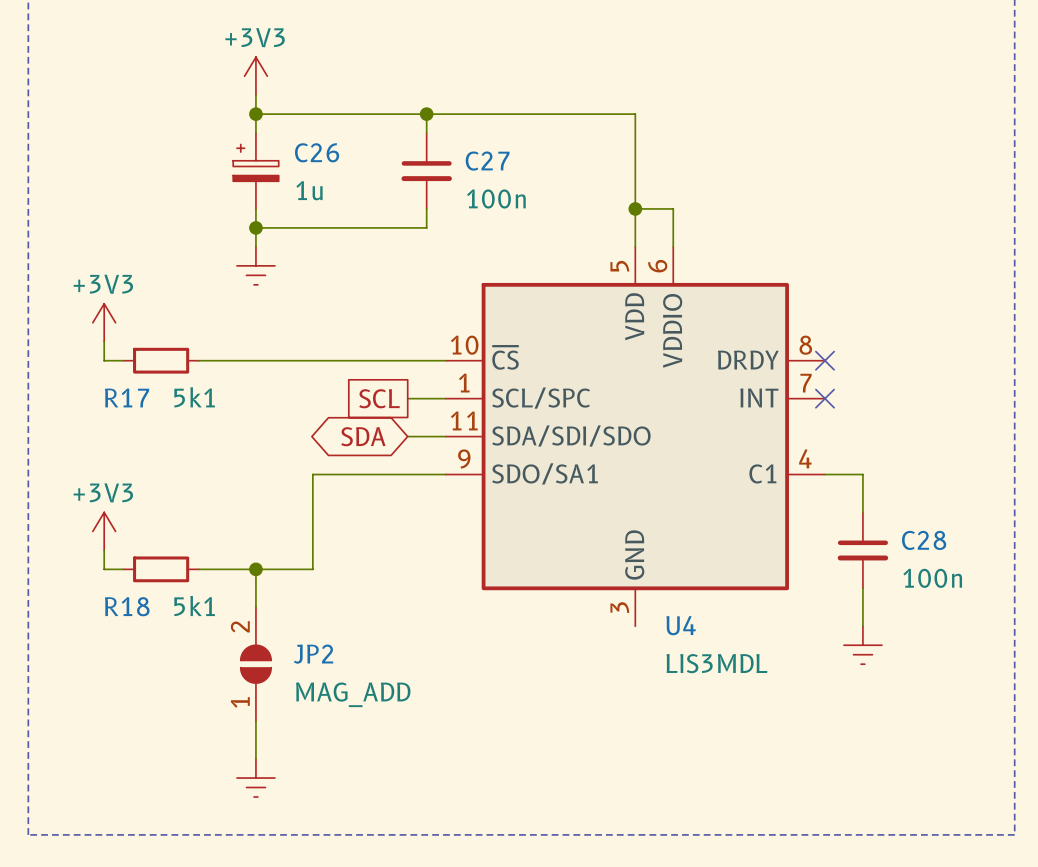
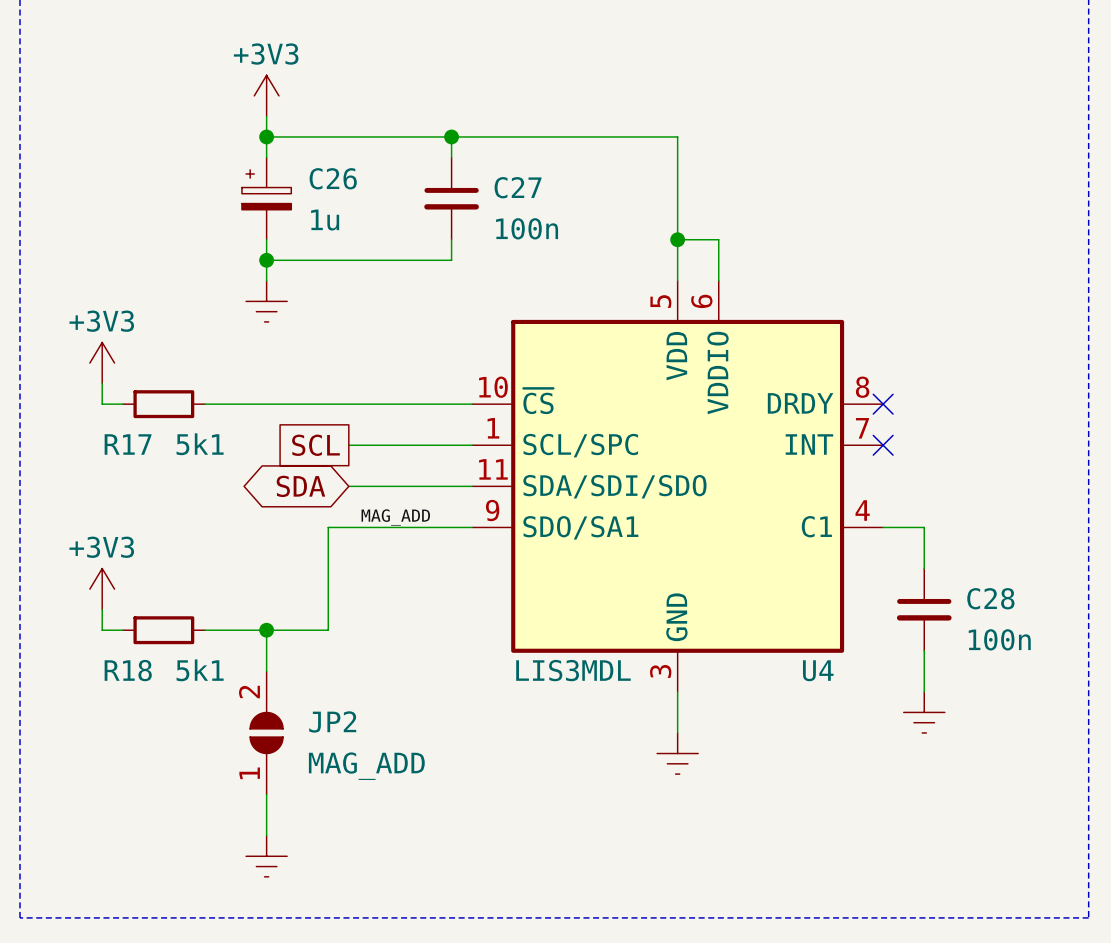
wire: none -> (348, 445) (431, 445)
global label position: SCL (379, 398) -> SCL (315, 445)
wire: none -> (348, 486) (431, 486)
global label position: SDA (363, 436) -> SDA (300, 486)
label: none -> MAG_ADD (395, 517)
U4 name position: U4 (681, 625) -> U4 (818, 670)
wire: none -> (677, 691) (677, 732)
U4 value position: LIS3MDL (716, 663) -> LIS3MDL (573, 670)
power symbol: none -> (677, 753)

